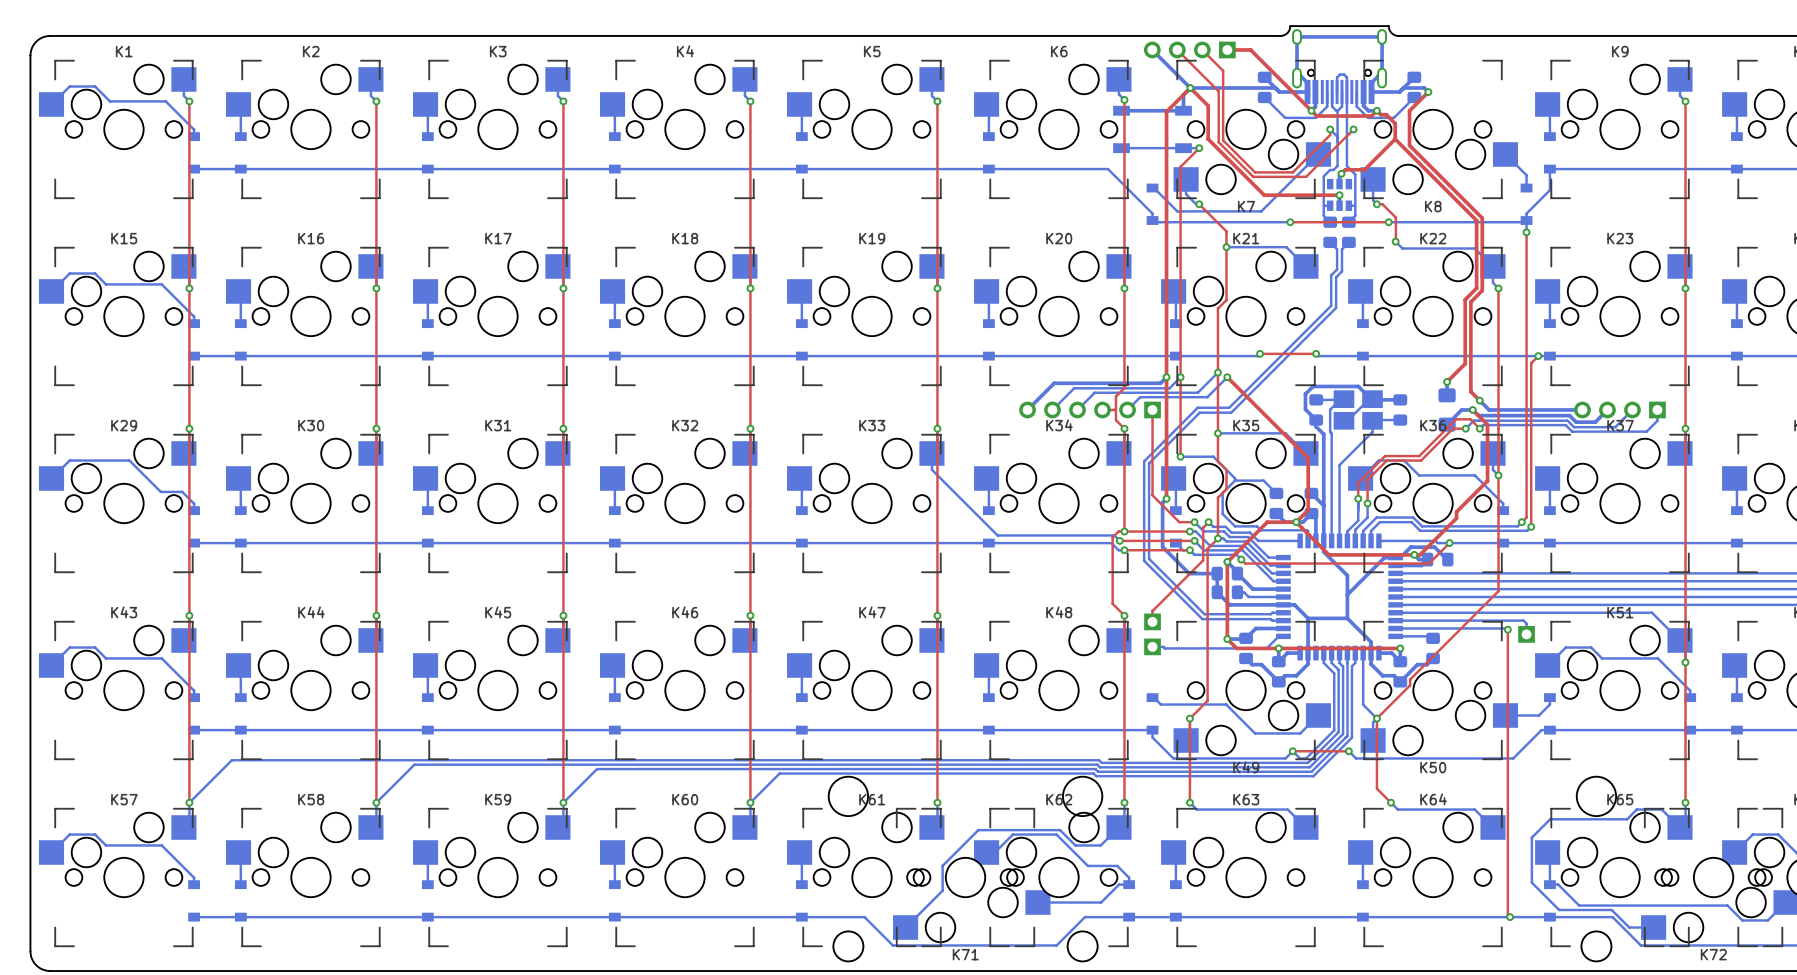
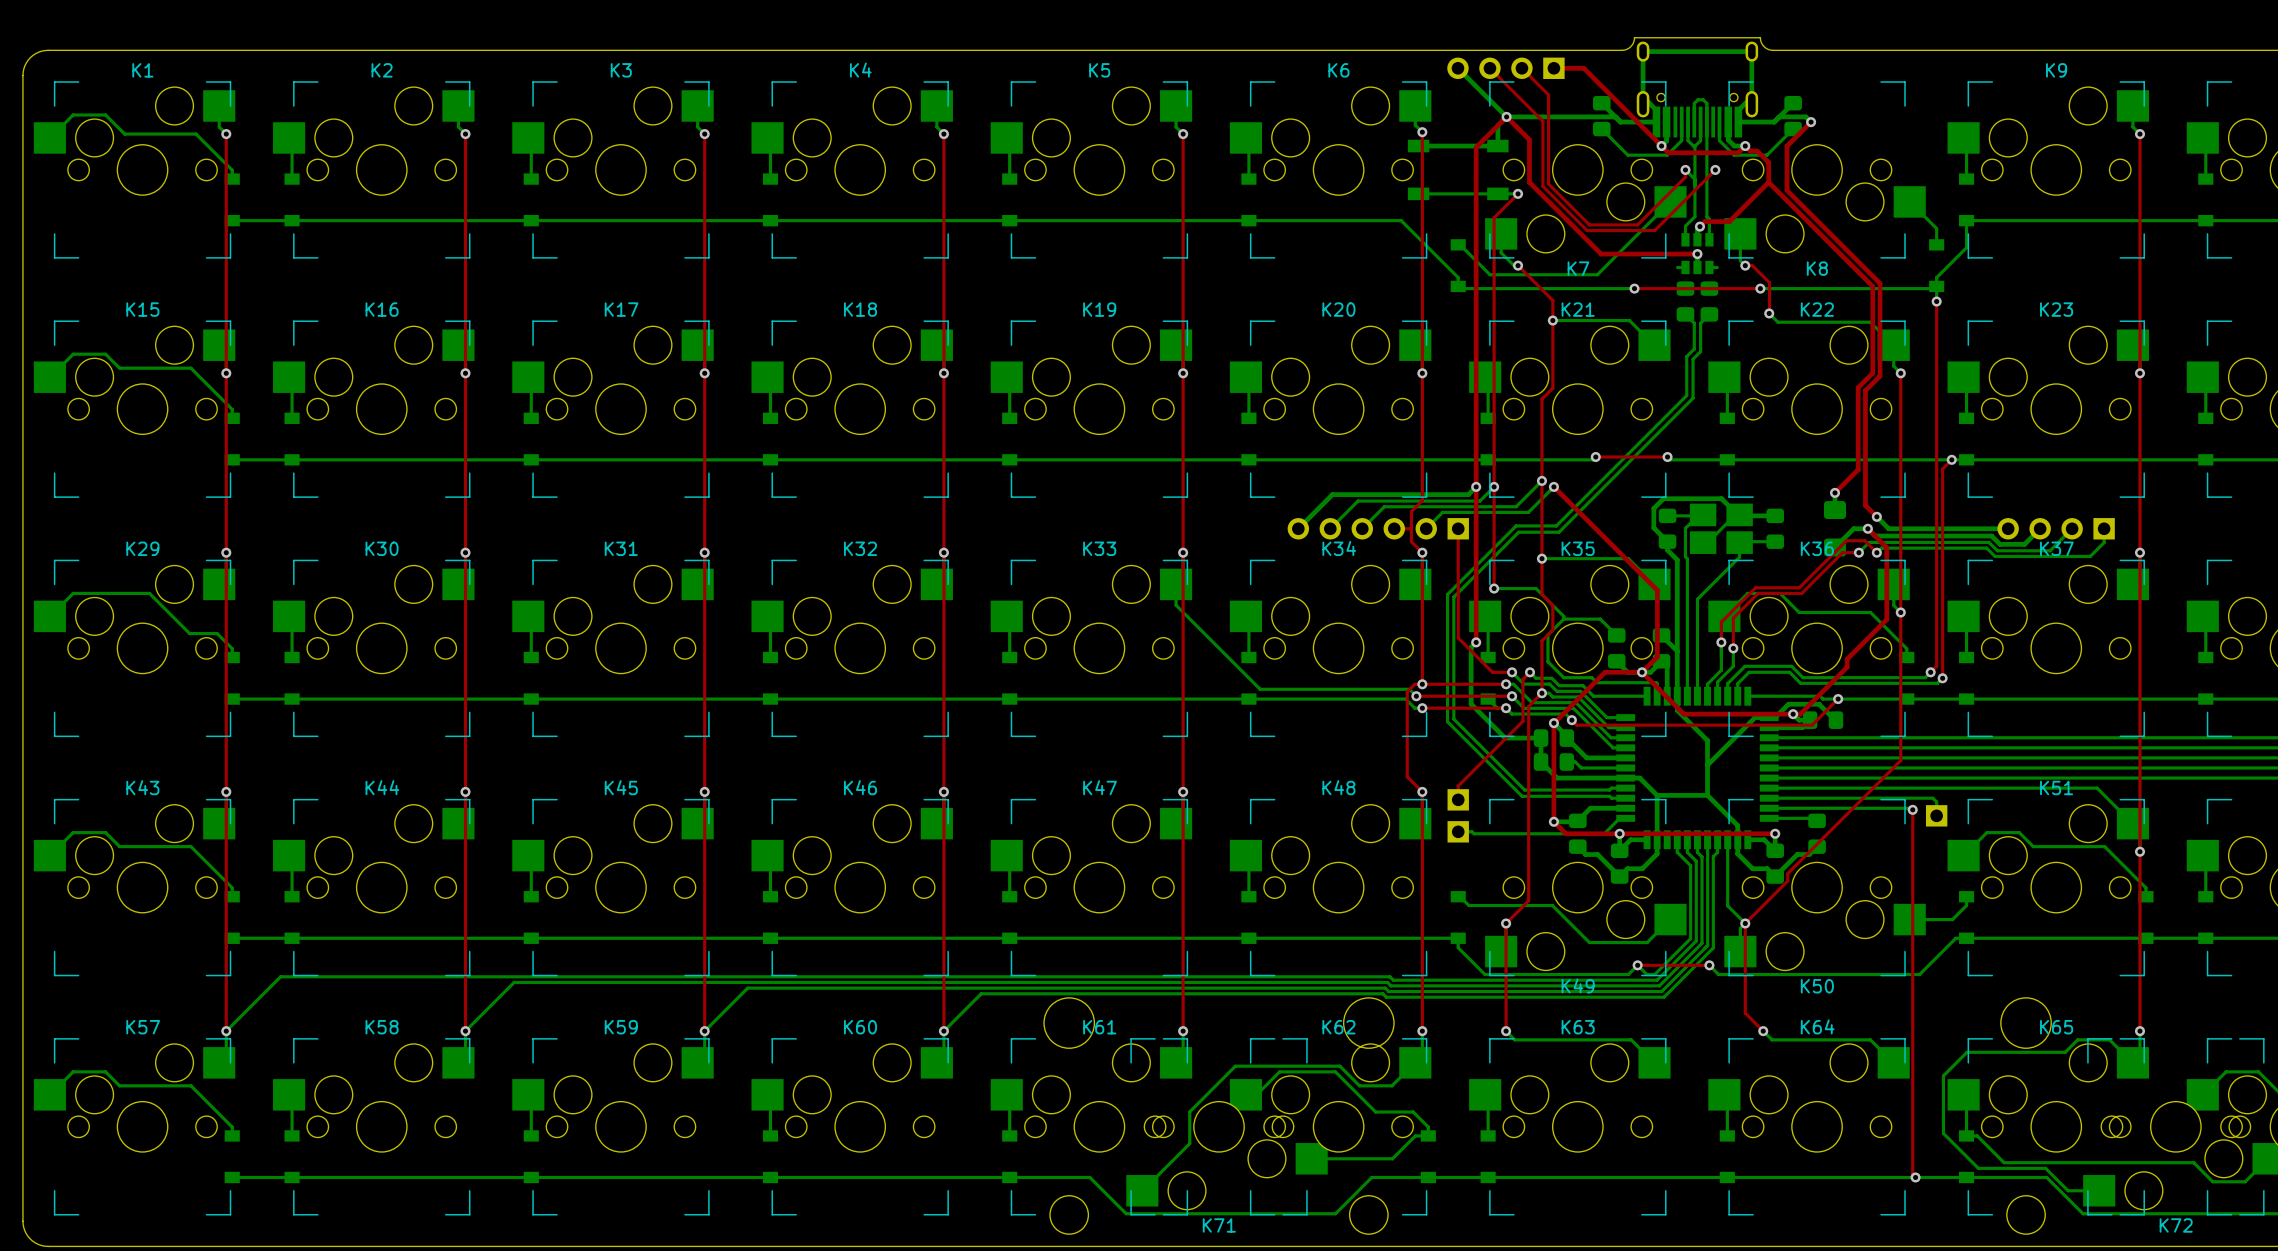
bottom track: (1348, 168) (1355, 174) (1355, 215) (1348, 222) -> (1709, 219) (1709, 239)
bottom track: (1333, 169) (1330, 169) (1323, 176) (1323, 215) (1330, 222) -> (1689, 221) (1685, 226) (1685, 239)

